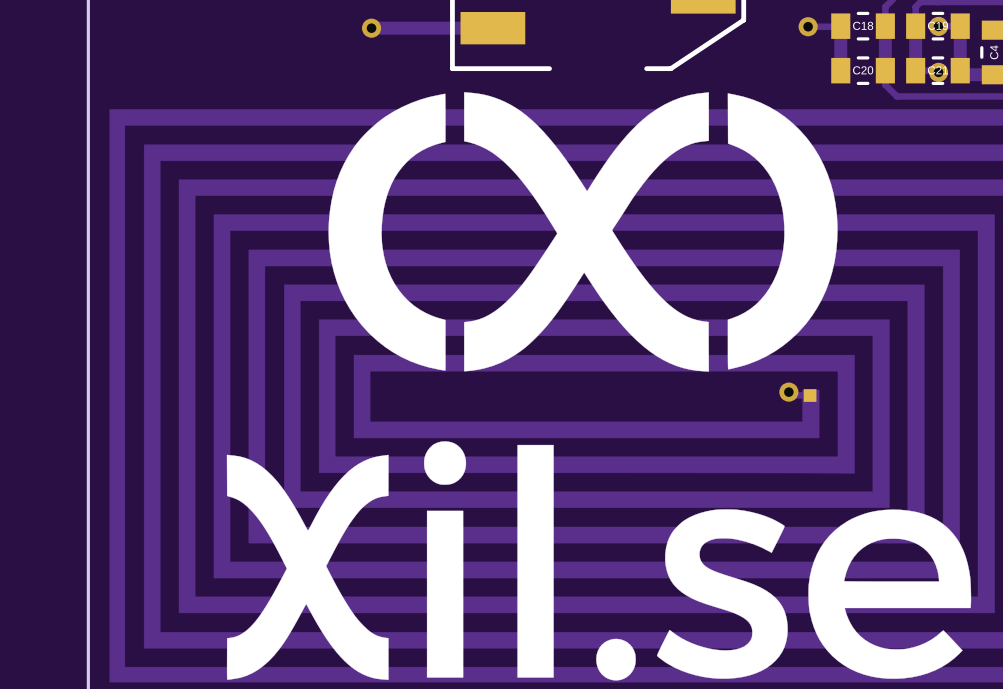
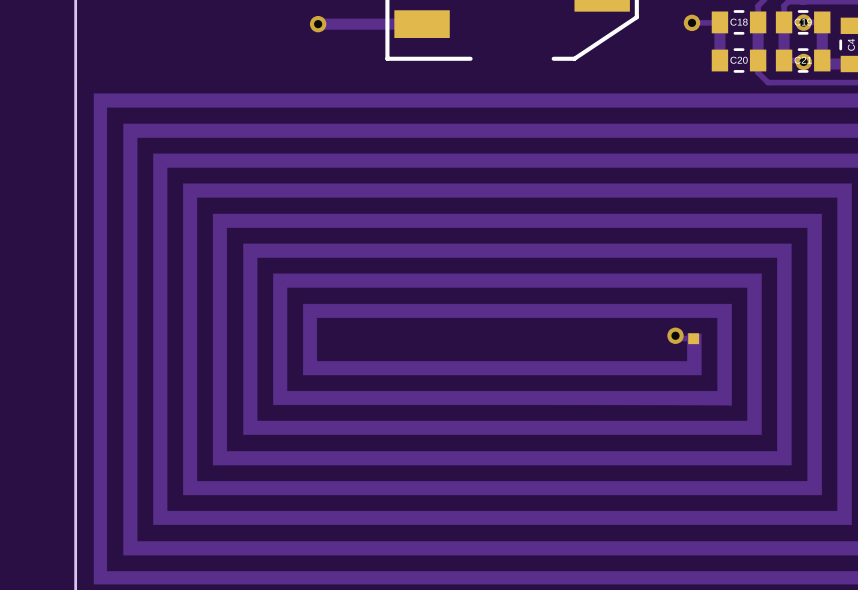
drawing: [226, 92, 972, 681] -> none

